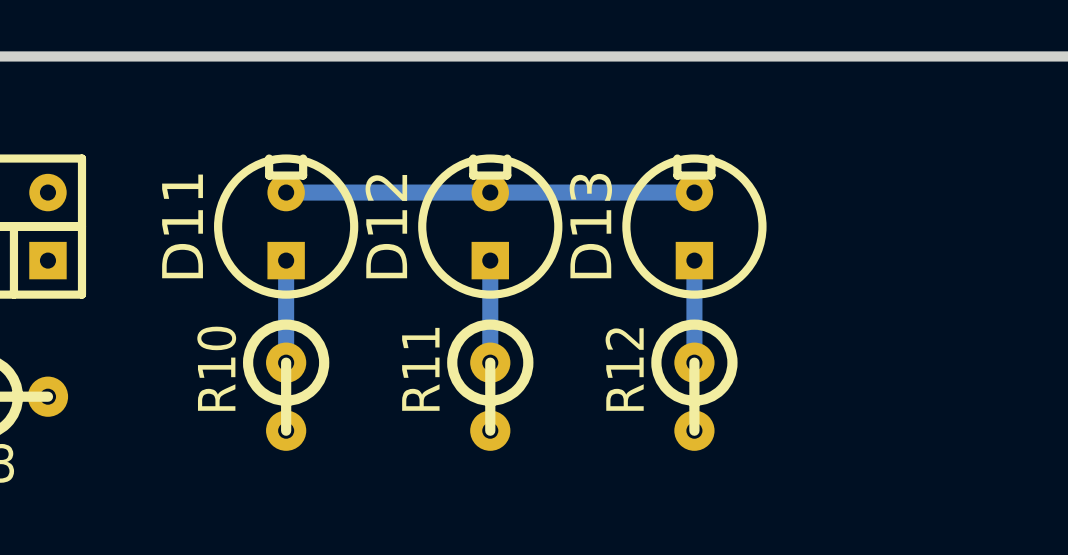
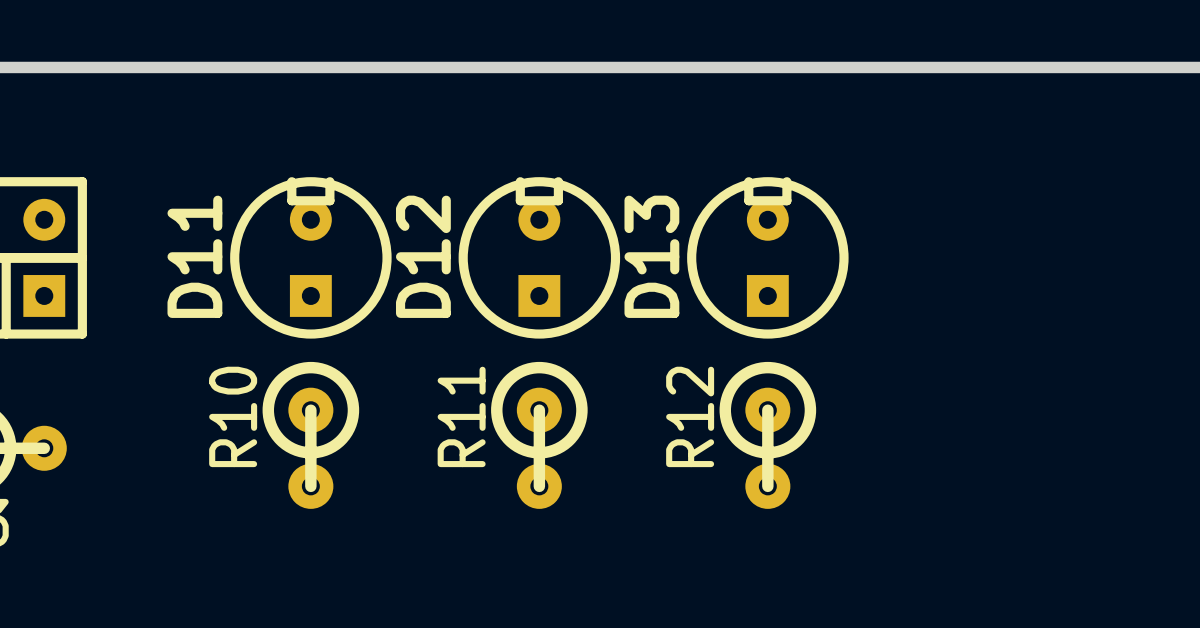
bottom track: (286, 192) (694, 192) -> none
bottom track: (286, 260) (286, 362) -> none
bottom track: (490, 260) (490, 362) -> none
bottom track: (694, 260) (694, 362) -> none

